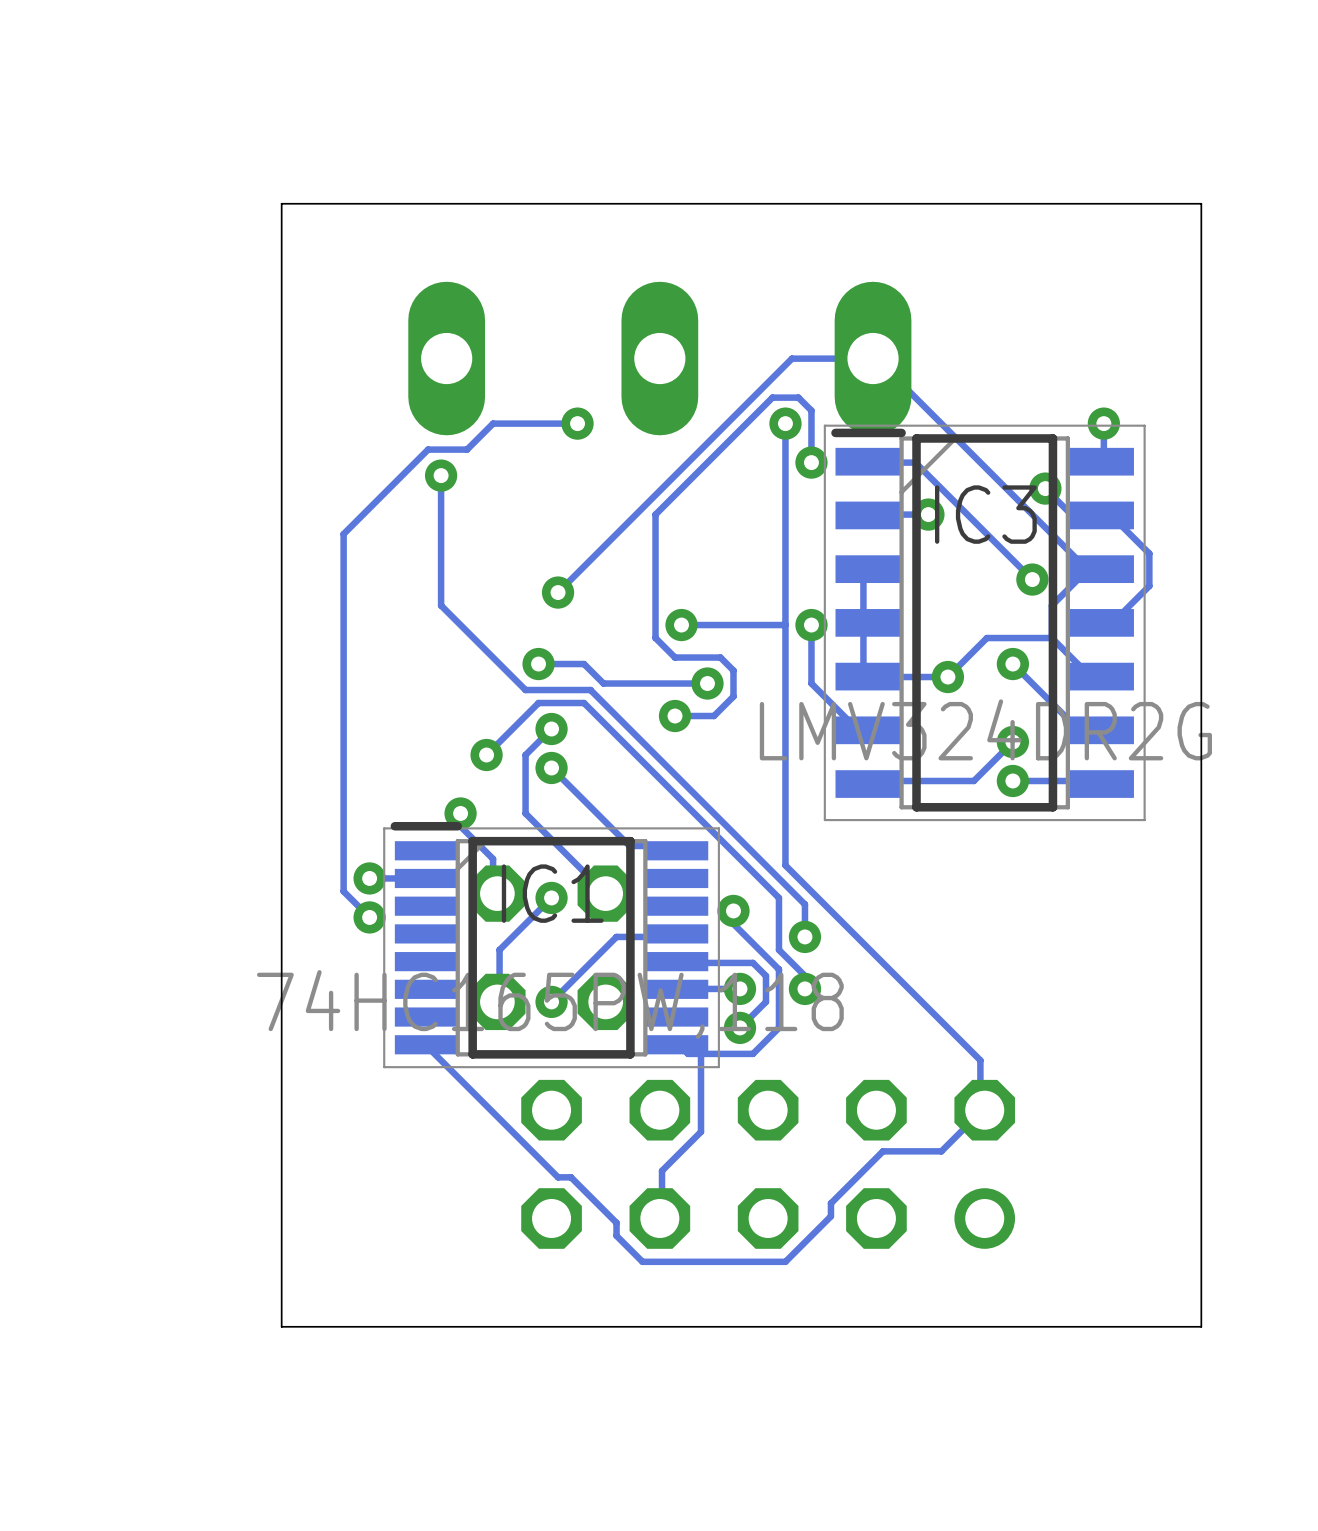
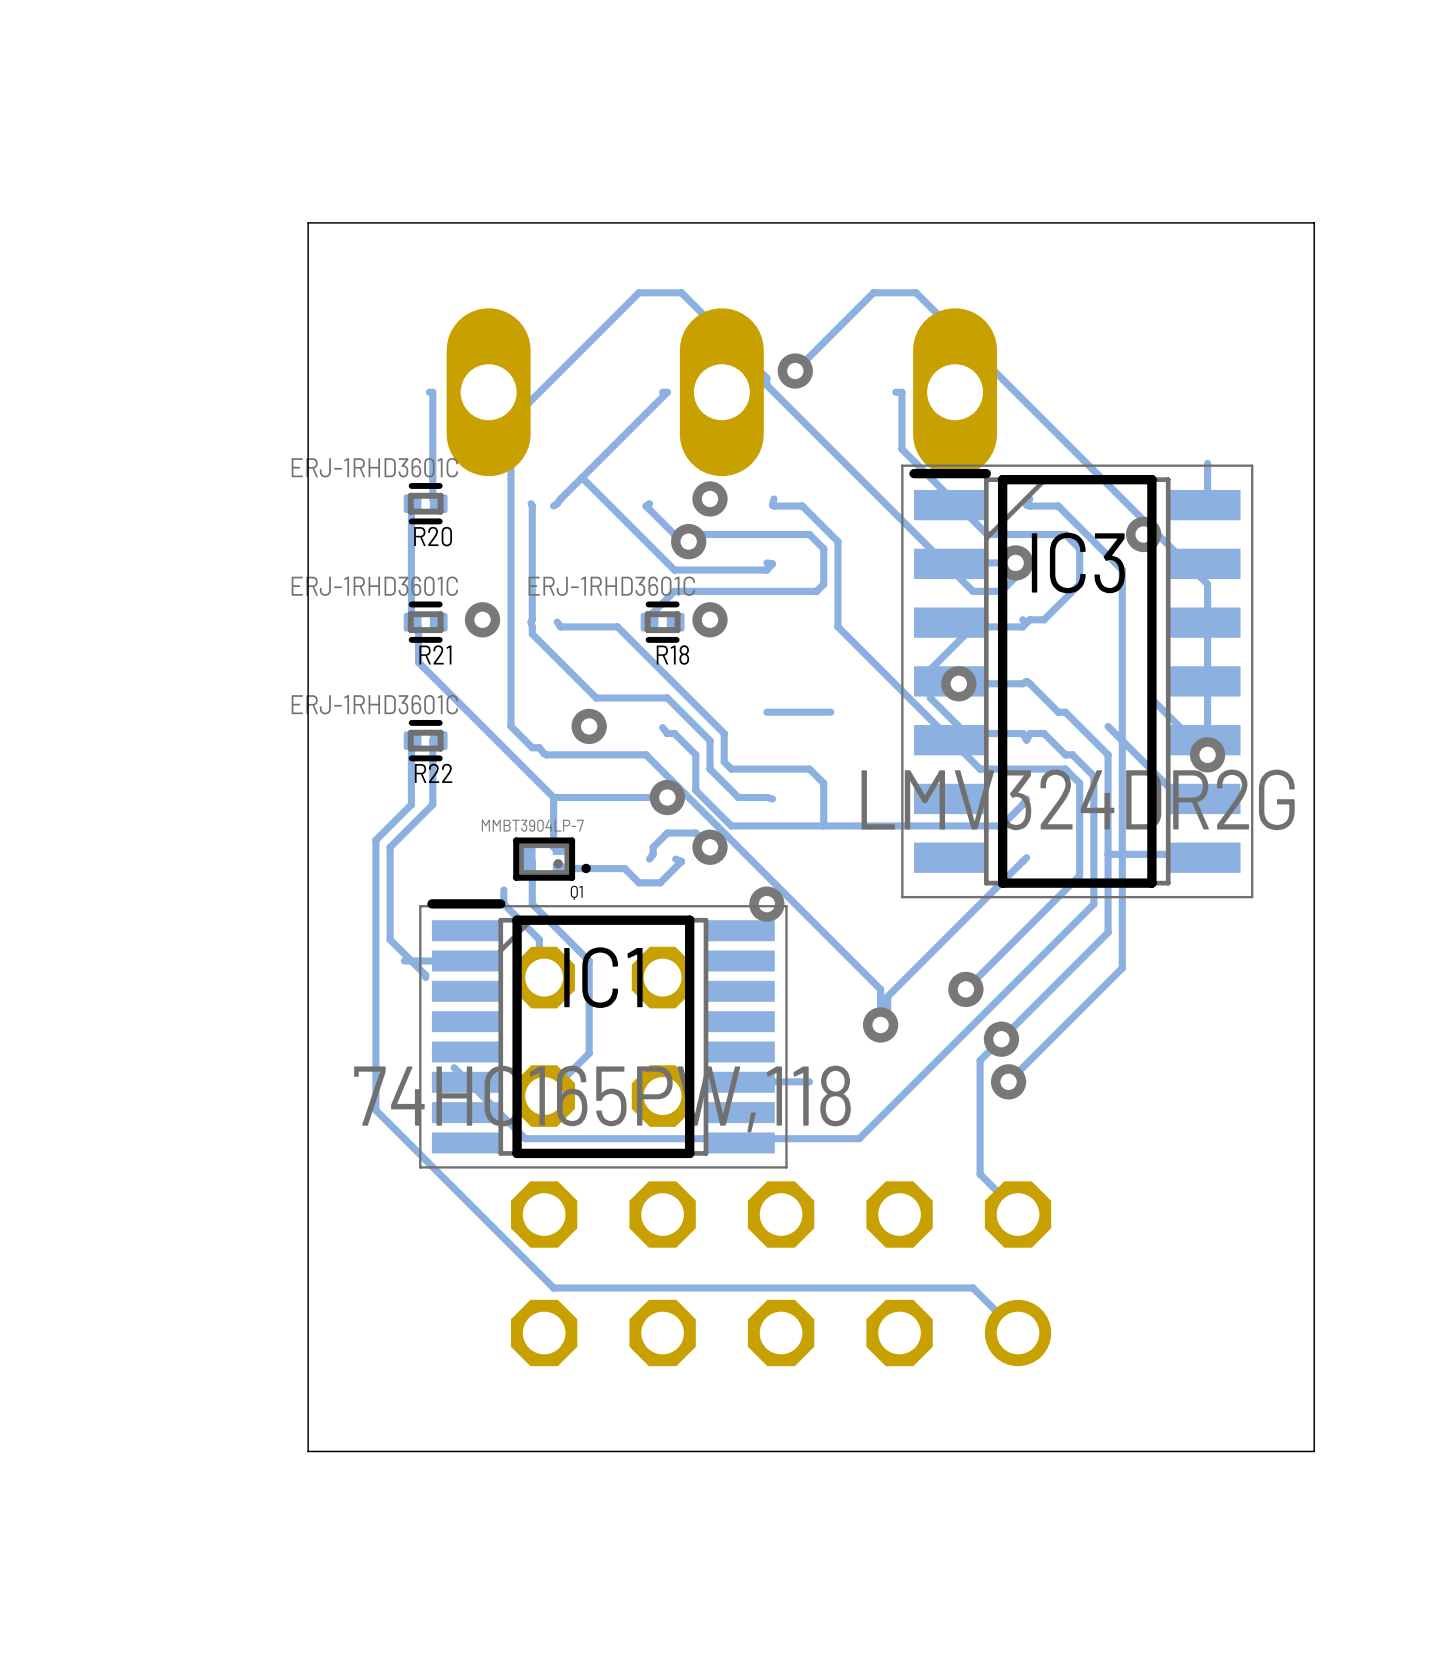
track: none -> (795, 371) (873, 292) (916, 292) (1207, 584) (1207, 754)
via: none -> (795, 371)
track: none -> (429, 392) (432, 392) (432, 498) (438, 503)
track: none -> (662, 392) (667, 392) (553, 506)
track: none -> (895, 392) (901, 392) (901, 449) (987, 534) (1065, 534) (1079, 548) (1079, 584) (1044, 619) (1029, 619) (1026, 622)
track: (577, 423) (493, 423) (467, 449) (428, 449) (343, 534) (343, 767) -> (412, 740) (411, 804) (375, 840)
via: (577, 423) -> none
track: (785, 423) (785, 865) (980, 1060) (980, 1105) (984, 1110) (941, 1151) (882, 1151) (830, 1203) (830, 1216) (785, 1261) (642, 1261) (616, 1235) (616, 1222) (571, 1177) -> (1018, 1333) (973, 1287) (624, 1287)
via: (785, 423) -> none
via: (1103, 423) -> none
track: none -> (582, 477) (674, 570) (766, 570) (772, 563) (766, 562)
via: none -> (710, 498)
track: none -> (773, 498) (772, 505) (773, 506) (802, 506) (837, 541) (837, 626) (980, 769) (1065, 769) (1079, 783) (1079, 875) (965, 989)
track: none -> (1029, 498) (1026, 505) (1058, 506) (1122, 570) (1122, 968) (1008, 1081)
track: none -> (412, 503) (412, 622)
R20: none -> ERJ-1RHD3601C (425, 503)
track: none -> (531, 503) (532, 634) (596, 697) (667, 697) (710, 740) (710, 769) (738, 797) (772, 798)
track: none -> (649, 503) (646, 506) (674, 534) (809, 534) (823, 548) (823, 584) (816, 591) (674, 591) (653, 612) (653, 619) (649, 622) (646, 619)
track: (868, 461) (915, 462) (1032, 579) -> none
track: (811, 462) (811, 410) (798, 397) (772, 397) (655, 514) (655, 638) (675, 657) (720, 657) (733, 670) (733, 696) (713, 716) (675, 716) -> none
via: (811, 462) -> none
track: (441, 475) (441, 605) (525, 690) -> (1026, 563) (1001, 591) (973, 591) (766, 385) (766, 378) (681, 292) (638, 292) (510, 420) (510, 726) (532, 747) (539, 747) (546, 754) (574, 754)
via: (441, 475) -> none
track: (1045, 488) (1071, 514) (1097, 514) (1100, 515) (1103, 521) (1116, 521) (1149, 553) (1149, 586) (1116, 618) (1103, 618) (1100, 622) -> none
via: none -> (688, 541)
via: none -> (482, 619)
via: none -> (710, 619)
track: none -> (1022, 619) (1026, 622)
track: none -> (412, 622) (418, 626) (418, 662) (553, 797)
R21: none -> ERJ-1RHD3601C (425, 622)
track: none -> (557, 622) (560, 626) (617, 626) (724, 733) (724, 761) (731, 769) (809, 769) (823, 783) (823, 825)
R18: none -> ERJ-1RHD3601C (662, 622)
track: (868, 569) (863, 573) (863, 618) (868, 622) (863, 625) (863, 670) (869, 677) (947, 677) (986, 638) (1051, 638) (1051, 605) (1084, 573) (1097, 573) (1100, 569) (1090, 573) (876, 358) (791, 358) (558, 592) -> none
track: none -> (1026, 622) (1022, 626) (973, 626) (930, 669) (930, 697) (965, 733) (1022, 733) (1026, 740) (1029, 733) (1044, 733) (1065, 754) (1072, 754) (1093, 776) (1093, 904) (859, 1138) (525, 1138) (454, 1067)
via: (1032, 579) -> none
via: (558, 592) -> none
via: (681, 625) -> none
track: (785, 625) (681, 625) -> (667, 797) (553, 797)
track: (811, 625) (811, 683) (863, 735) (868, 730) -> none
via: (811, 625) -> none
track: none -> (958, 683) (1022, 683) (1026, 681) (1058, 712) (1065, 712) (1108, 754) (1108, 932) (980, 1060) (980, 1174) (1015, 1209) (1018, 1214)
via: none -> (958, 683)
track: none -> (830, 712) (766, 712)
track: (551, 664) (584, 664) (603, 683) (707, 683) -> none
via: (1012, 664) -> none
track: none -> (662, 727) (667, 733) (674, 733) (695, 754) (695, 790) (731, 825) (1001, 825) (1026, 798)
R22: none -> ERJ-1RHD3601C (425, 740)
track: none -> (438, 740) (432, 740) (432, 804) (390, 847) (390, 939) (425, 975) (425, 977)
via: (947, 677) -> none
via: (707, 683) -> none
via: none -> (1207, 754)
via: (675, 716) -> none
track: none -> (553, 797) (553, 847) (559, 850)
track: (551, 729) (525, 755) (525, 813) (605, 893) -> none
via: (551, 729) -> none
via: none -> (667, 797)
track: (1012, 742) (973, 780) (869, 780) (868, 784) -> none
via: (1012, 742) -> none
track: (486, 755) (538, 703) (584, 703) (778, 897) (778, 949) (804, 975) (804, 988) -> none
via: (486, 755) -> none
track: (551, 767) (629, 845) (675, 845) (676, 850) -> none
via: (551, 767) -> none
track: none -> (710, 847) (695, 833) (667, 833) (653, 847) (653, 854) (649, 859)
via: none -> (710, 847)
via: (1012, 780) -> none
track: none -> (1026, 857) (887, 996) (887, 1017)
Q1: none -> MMBT3904LP-7 (551, 859)
track: none -> (675, 859) (681, 861) (660, 882) (638, 882) (624, 868) (559, 867)
via: (460, 813) -> none
via: none -> (766, 904)
via: (369, 878) -> none
track: (343, 891) (369, 917) -> none
track: (551, 897) (499, 949) (499, 1001) -> (528, 859) (532, 861) (532, 904) (589, 961) (589, 1053) (546, 1096)
via: (551, 897) -> none
via: none -> (965, 989)
track: (733, 910) (733, 923) (778, 969) (778, 1027) (752, 1053) (688, 1053) (676, 1044) (701, 1053) (701, 1131) (662, 1170) (662, 1216) (659, 1218) -> none
via: (733, 910) -> none
via: (369, 917) -> none
track: (676, 933) (675, 936) (616, 936) (551, 1001) -> none
via: none -> (1001, 1039)
track: (676, 961) (752, 962) (765, 975) (765, 1001) (739, 1027) -> none
via: (739, 988) -> none
via: (804, 988) -> none
via: none -> (1008, 1081)
via: (551, 1001) -> none
via: (739, 1027) -> none
track: (426, 1044) (558, 1177) -> (375, 975) (375, 1110) (553, 1287) (610, 1287)
part position: (768, 1164) -> (781, 1273)

